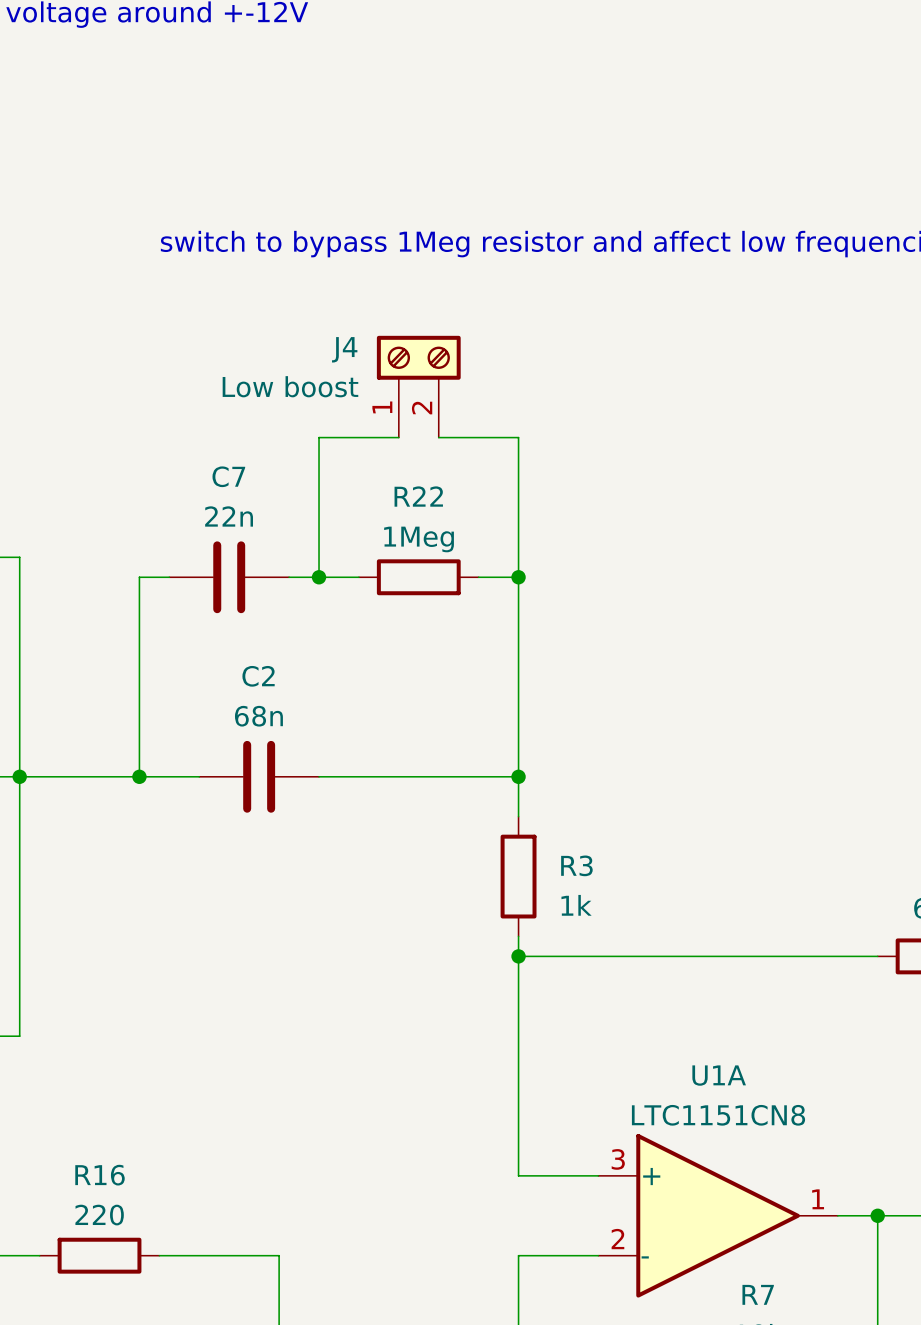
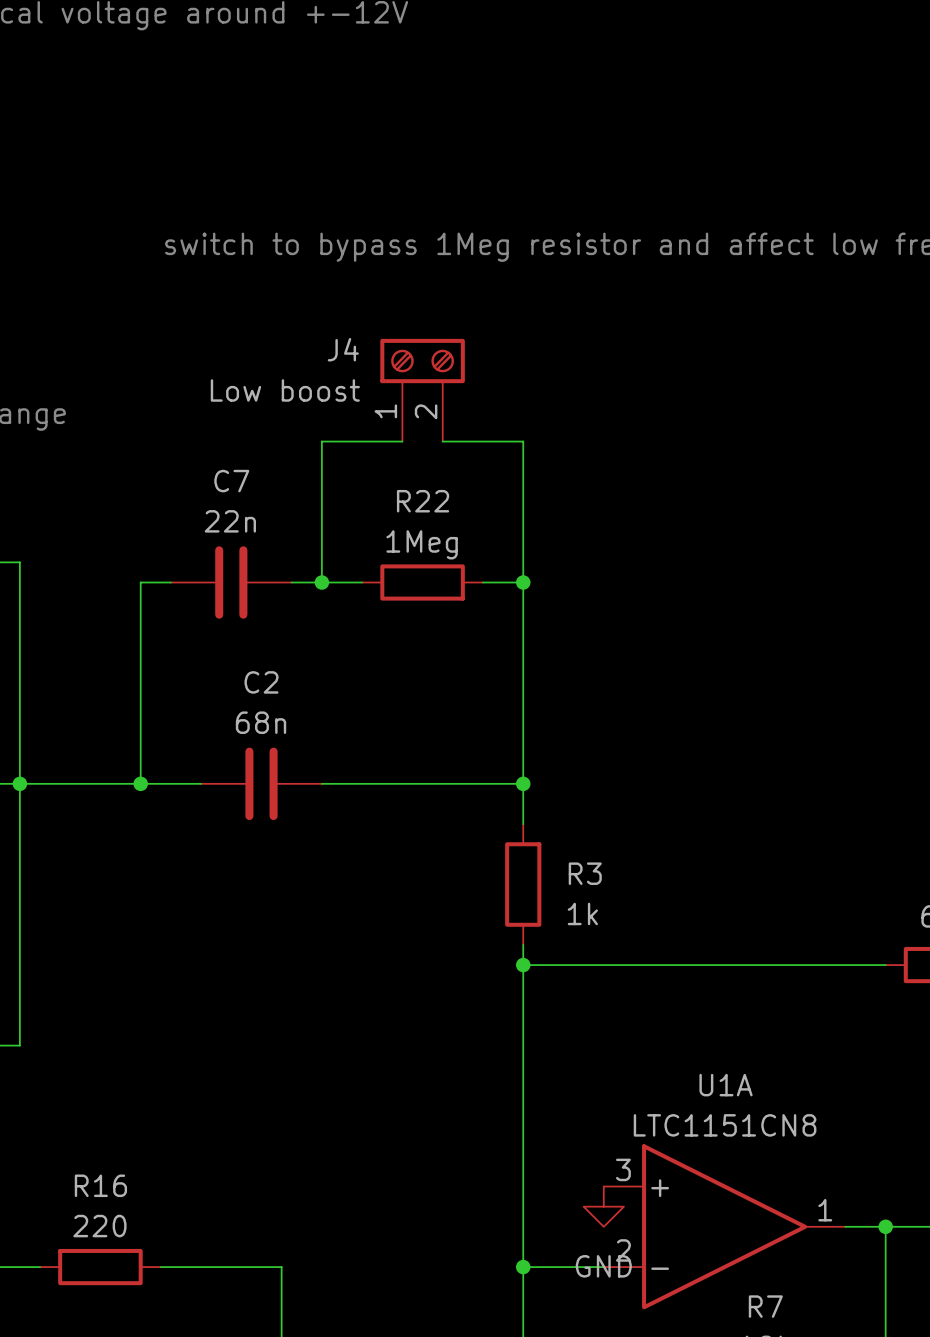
wire: (518, 1175) (598, 1175) -> (523, 1186) (523, 1267)
power symbol: none -> GND (603, 1206)
junction: none -> (523, 1267)

